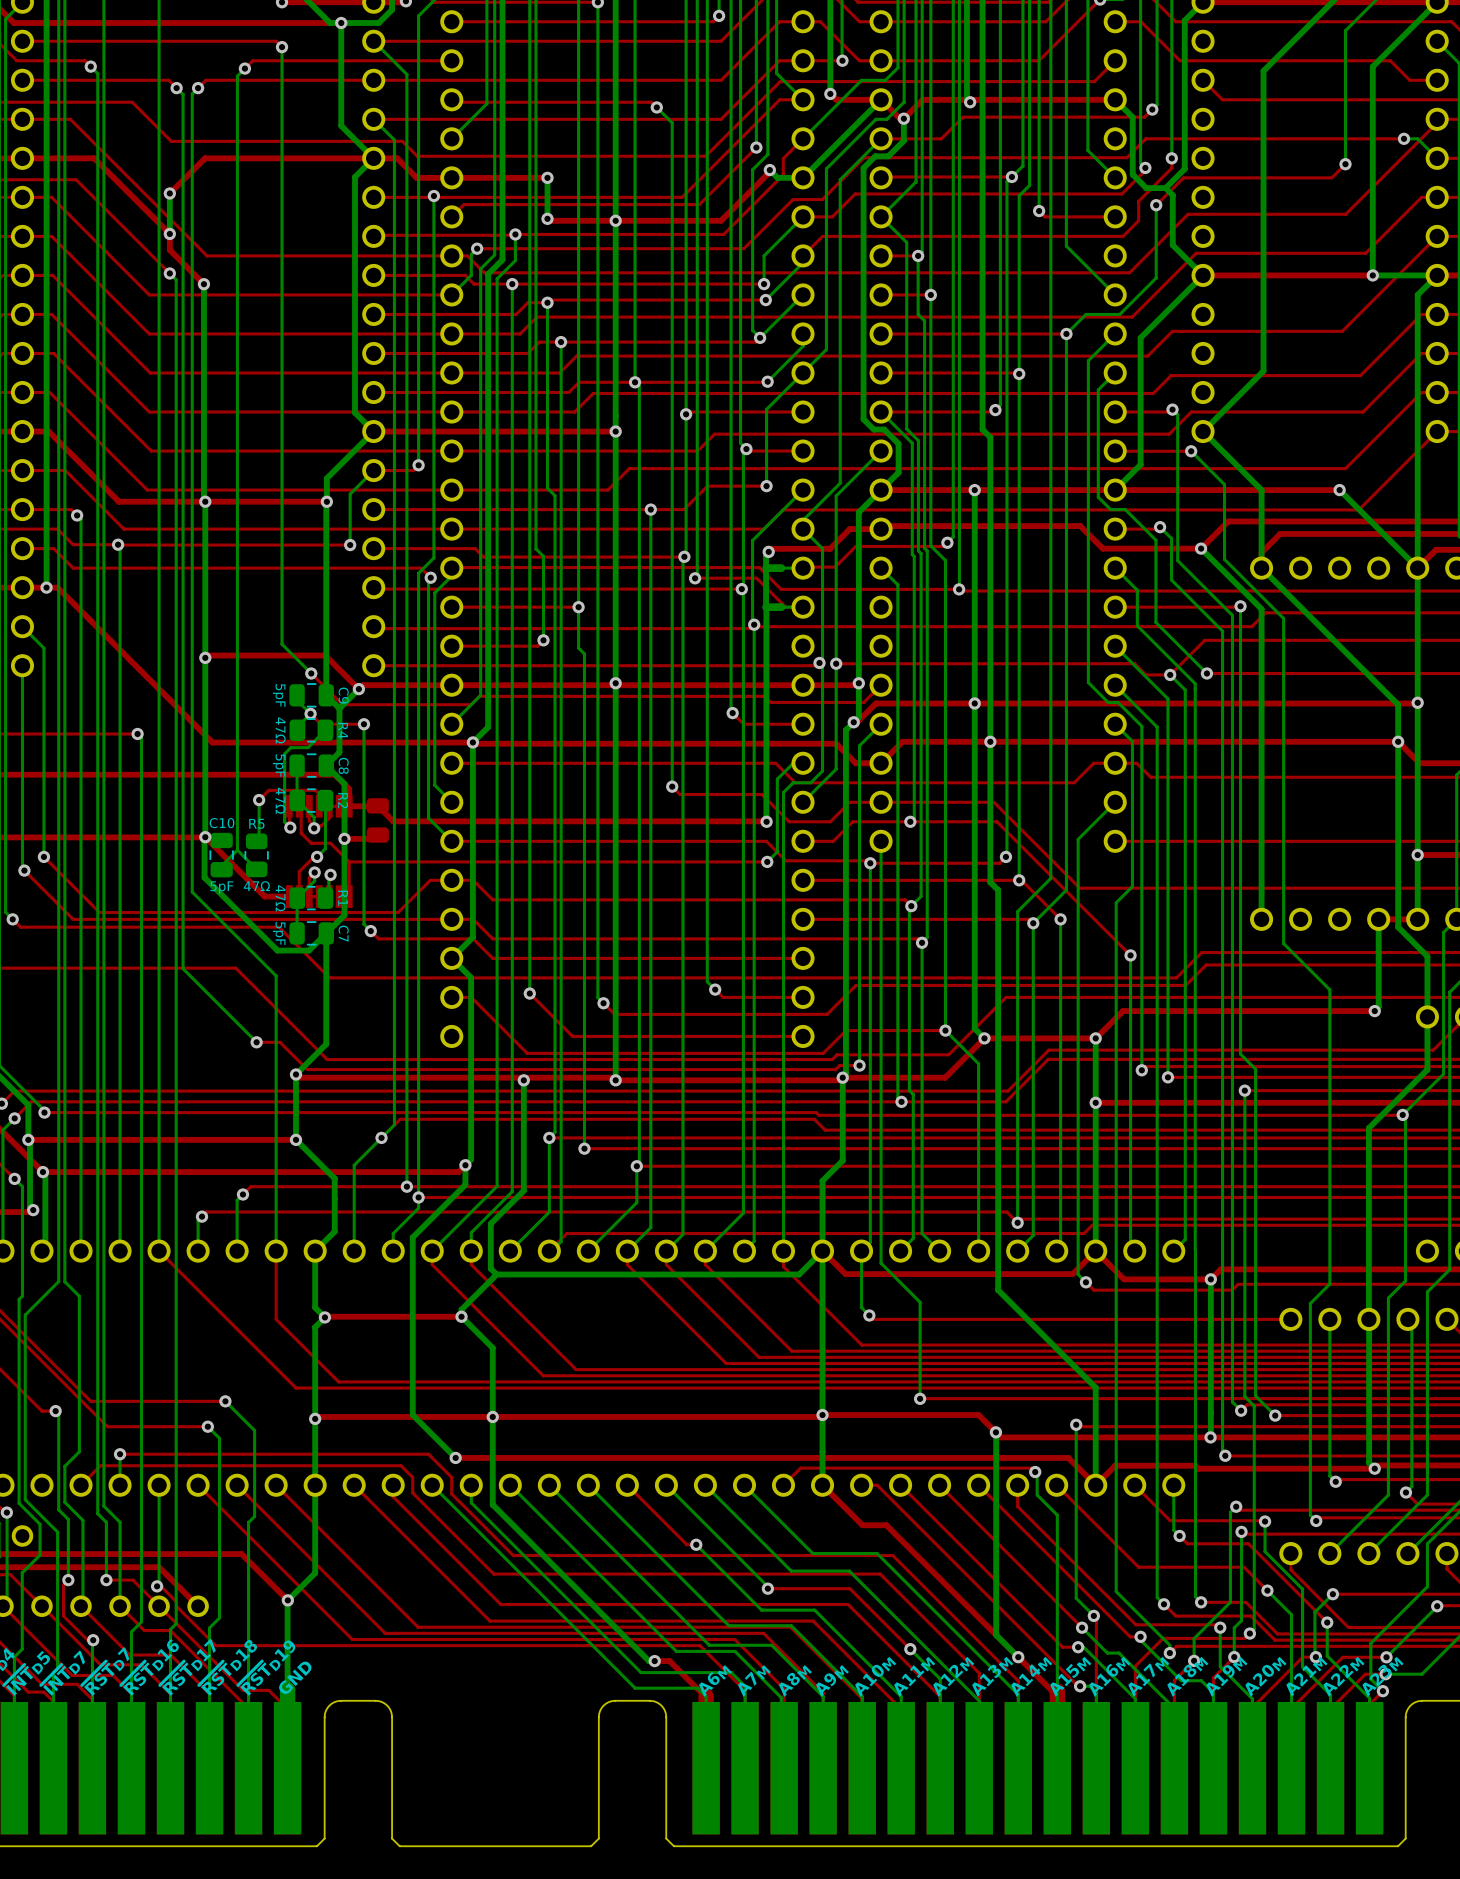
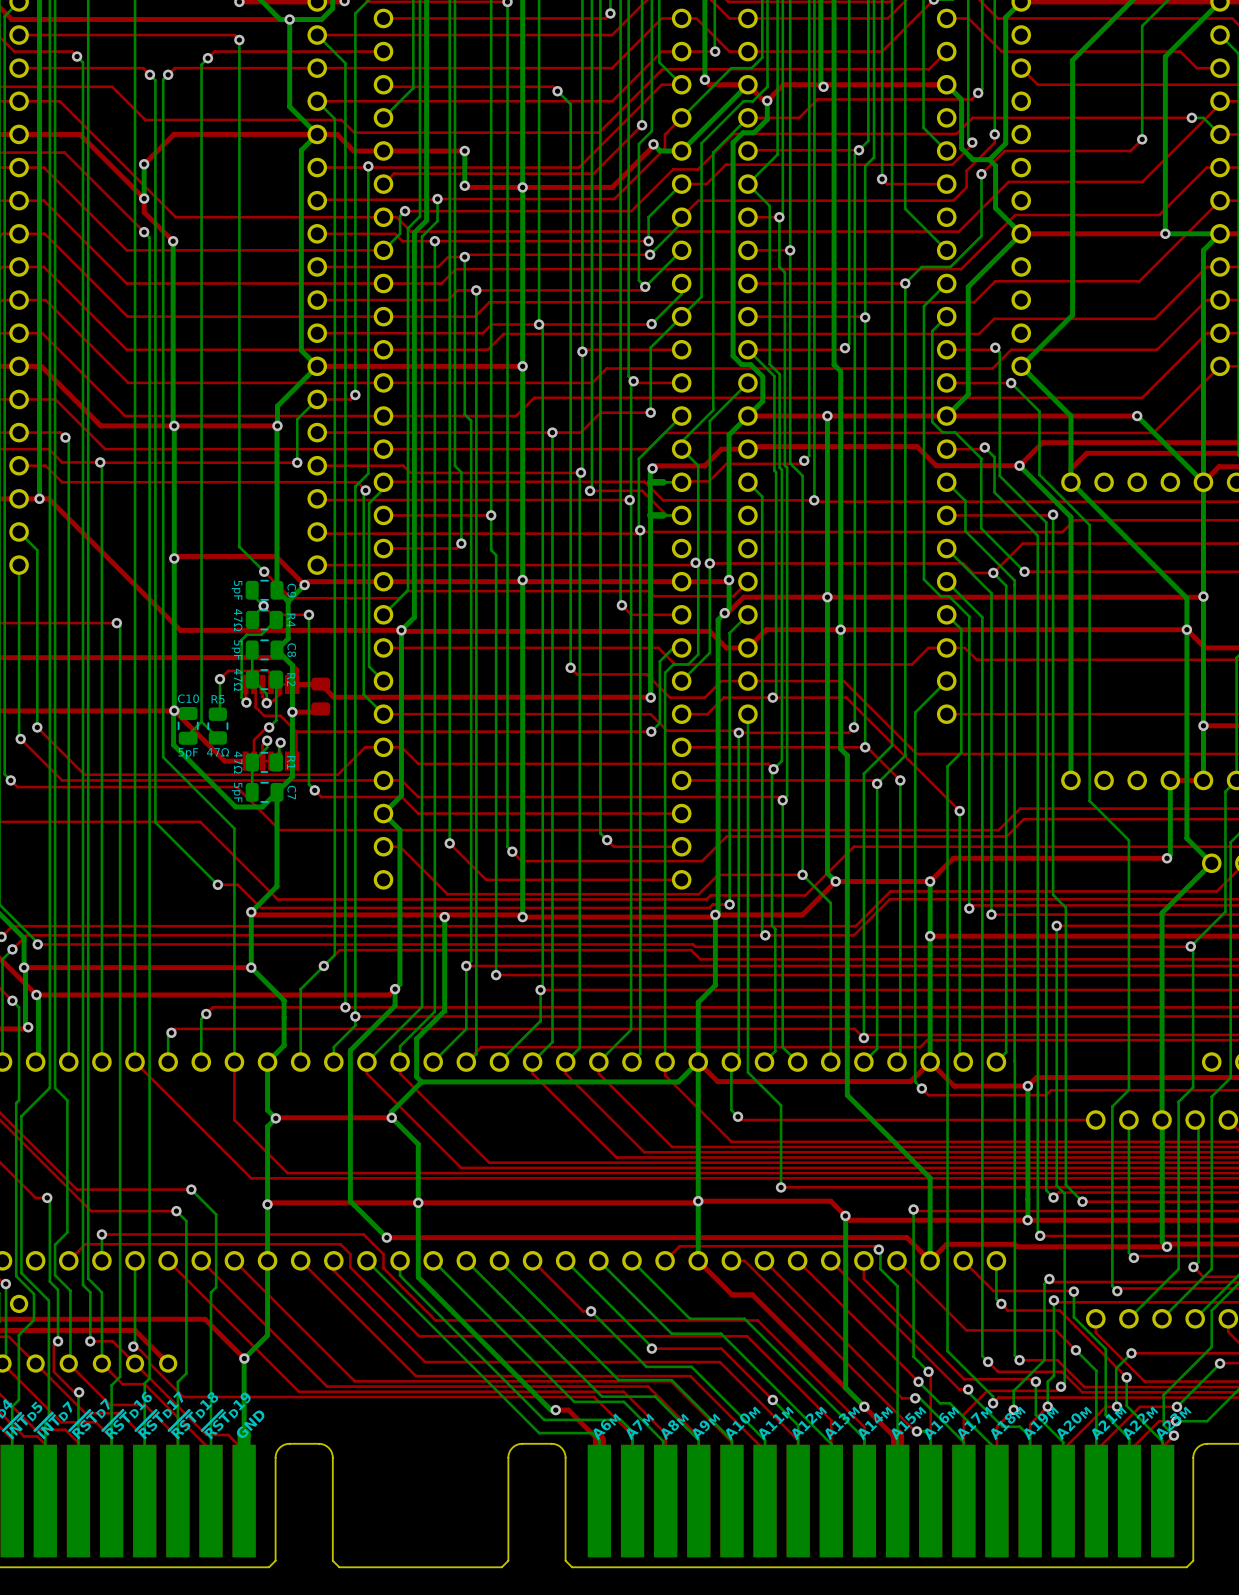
bottom track: (1398, 927) (1427, 956) (1427, 1069) (1368, 1128) -> (1186, 787) (1186, 838) (1211, 863) (1162, 912) (1162, 957)

